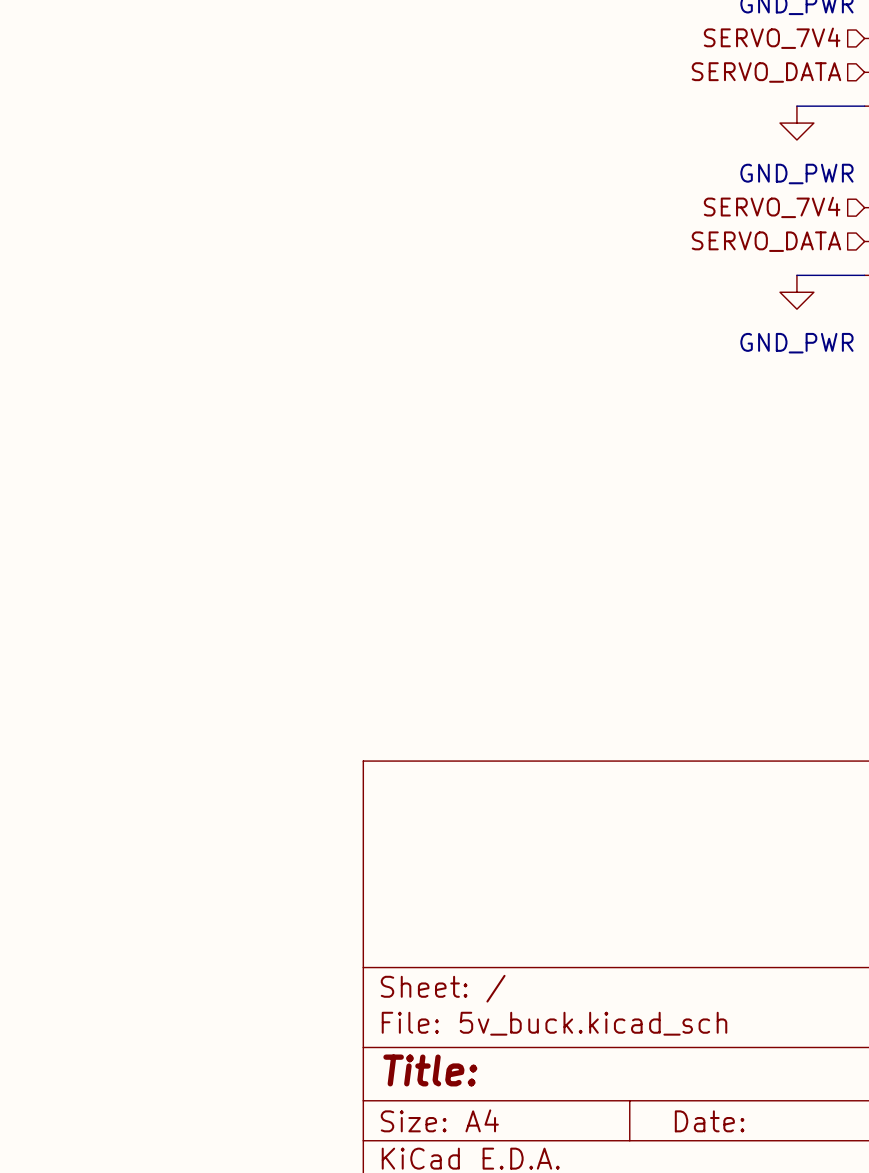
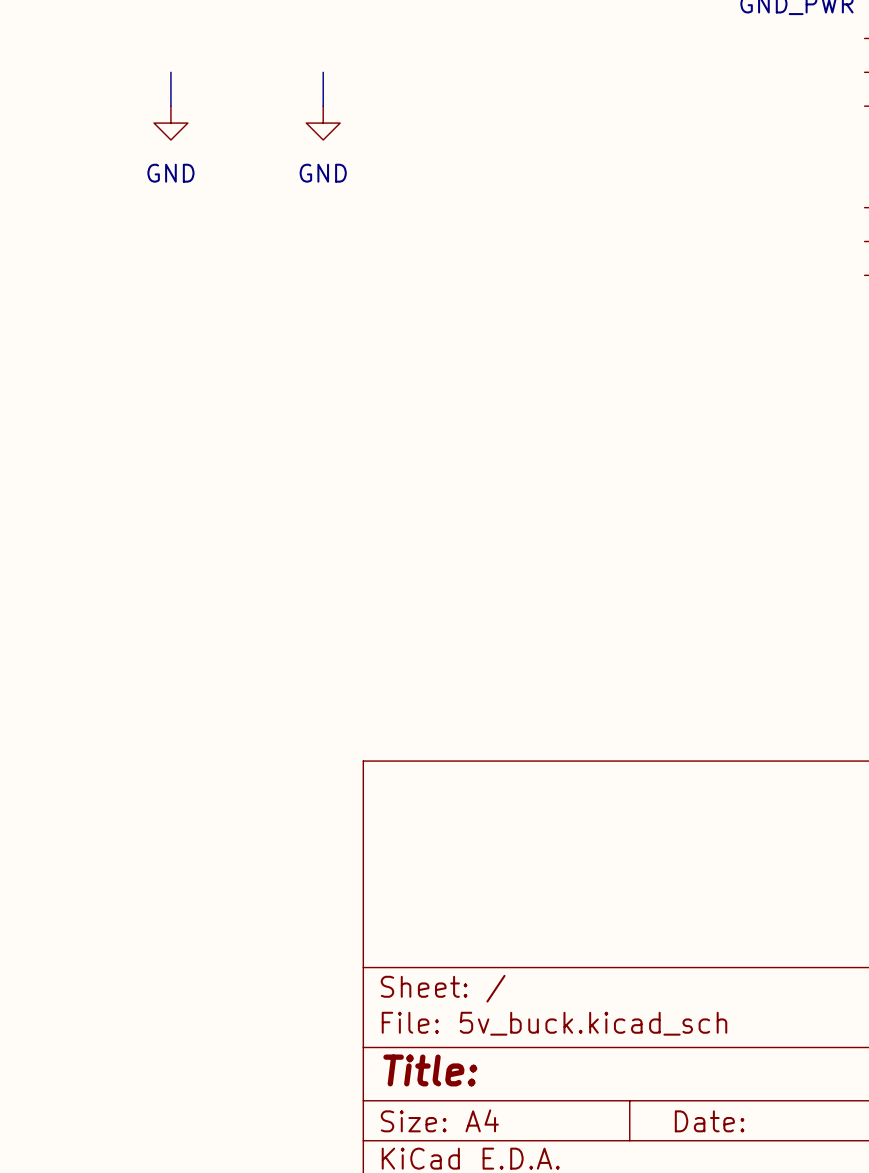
hierarchical label: SERVO_7V4 (772, 38) -> none
wire: none -> (170, 72) (170, 106)
wire: none -> (323, 72) (323, 106)
hierarchical label: SERVO_DATA (766, 72) -> none
wire: (796, 106) (864, 106) -> none
power symbol: none -> GND (170, 123)
power symbol: none -> GND (323, 123)
power symbol: GND_PWR (796, 123) -> none
hierarchical label: SERVO_7V4 (772, 207) -> none
hierarchical label: SERVO_DATA (766, 241) -> none
wire: (796, 275) (864, 275) -> none
power symbol: GND_PWR (796, 292) -> none

